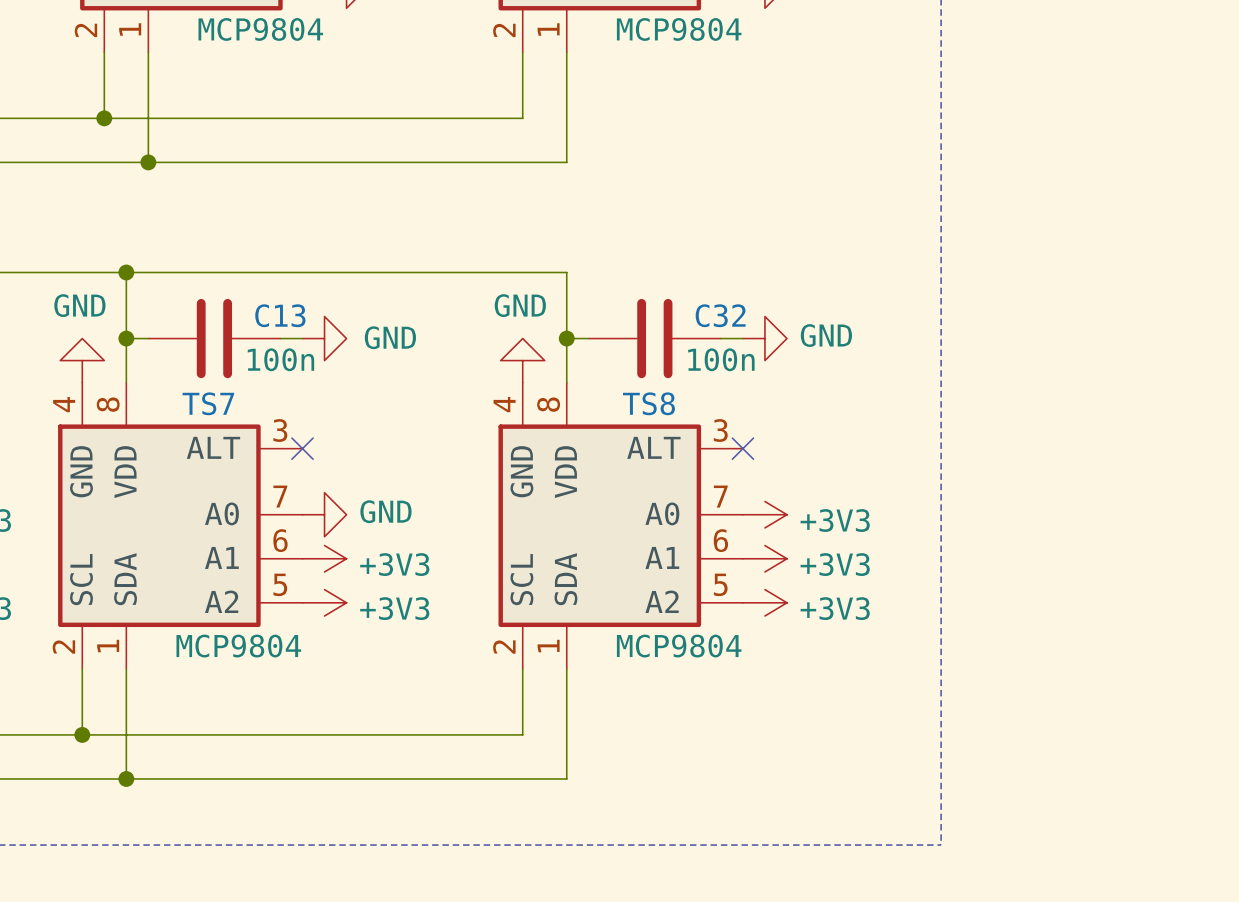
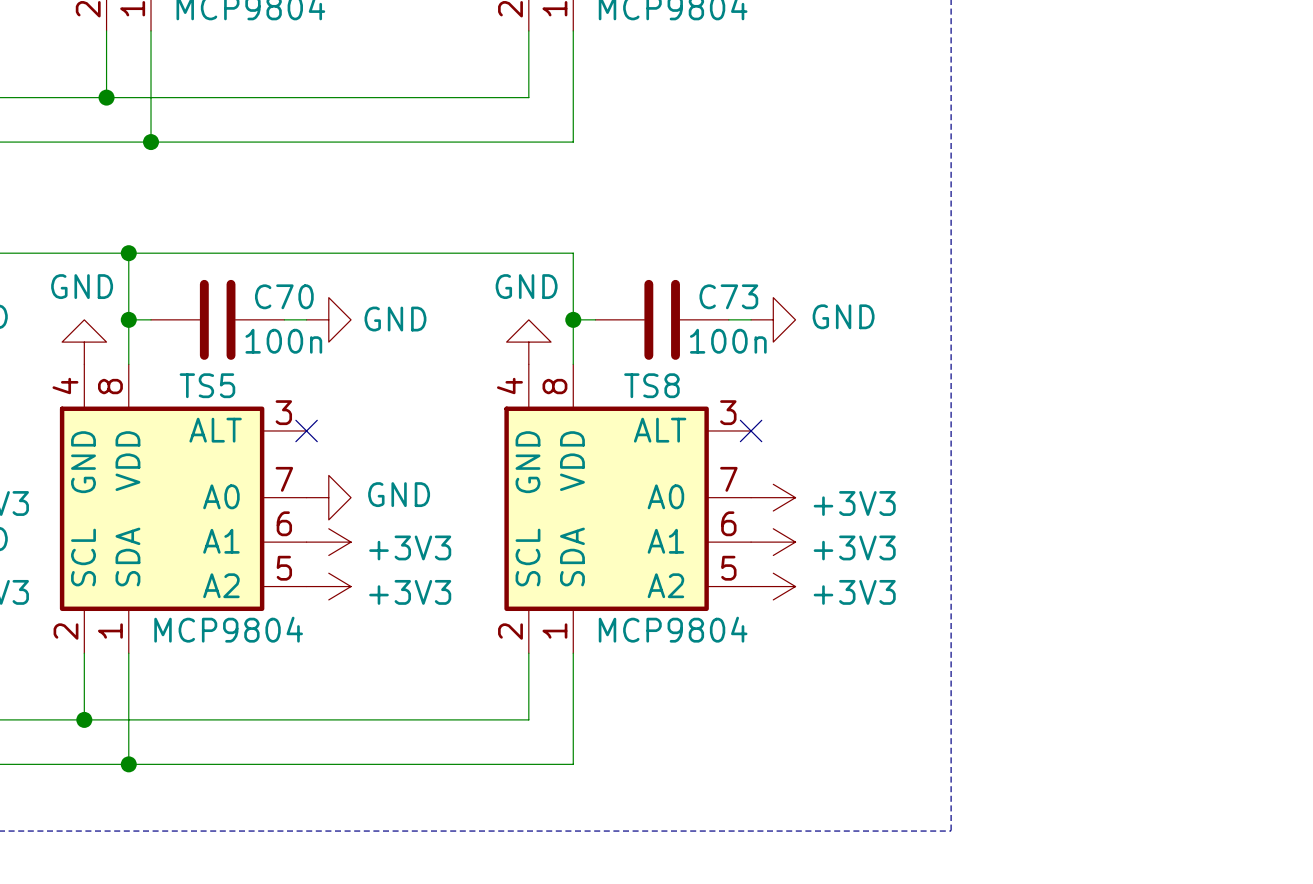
C13 name: C13 (280, 315) -> C70 (284, 296)
C32 name: C32 (720, 315) -> C73 (728, 296)
TS7 name: TS7 (208, 403) -> TS5 (207, 385)

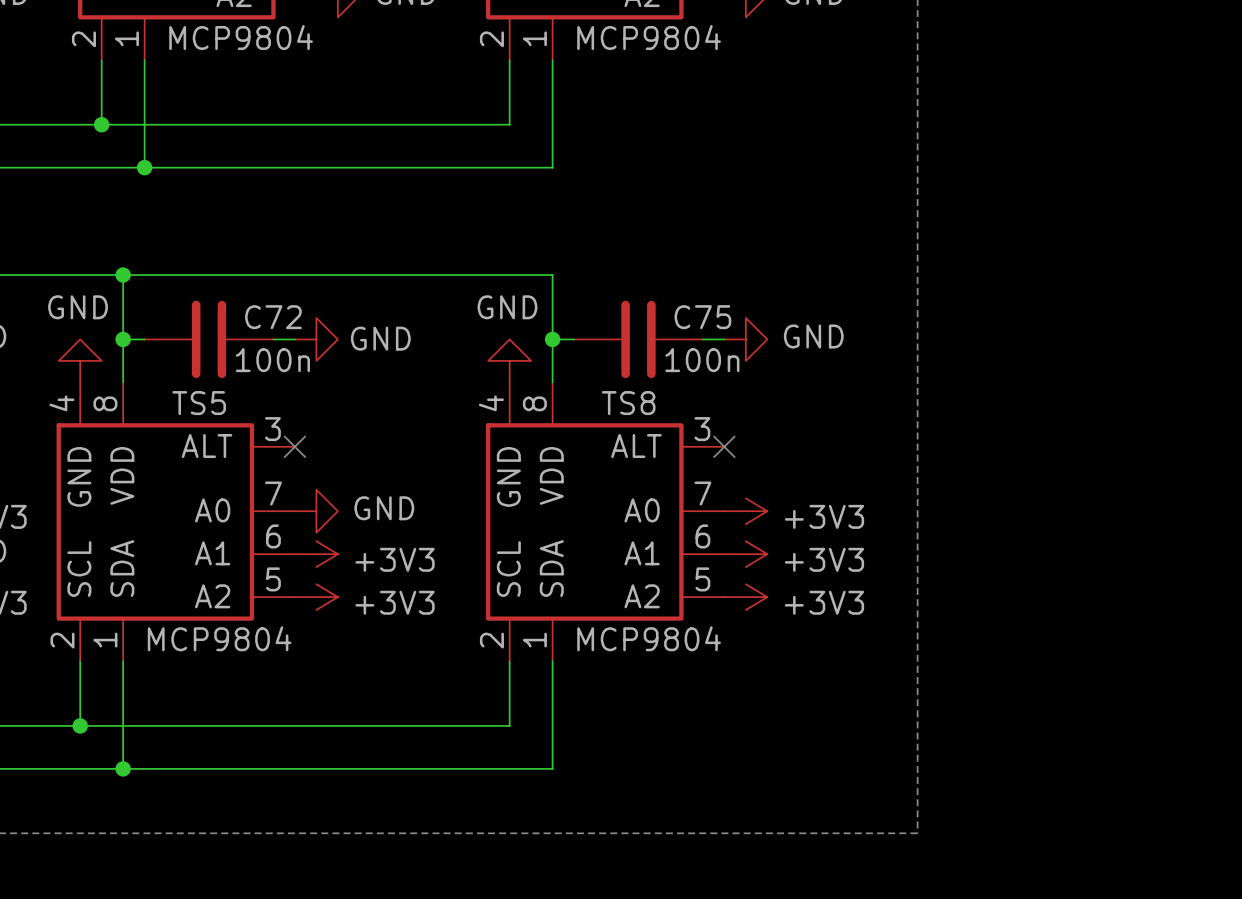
C70 name: C70 (284, 296) -> C72 (273, 317)
C73 name: C73 (728, 296) -> C75 (702, 317)

